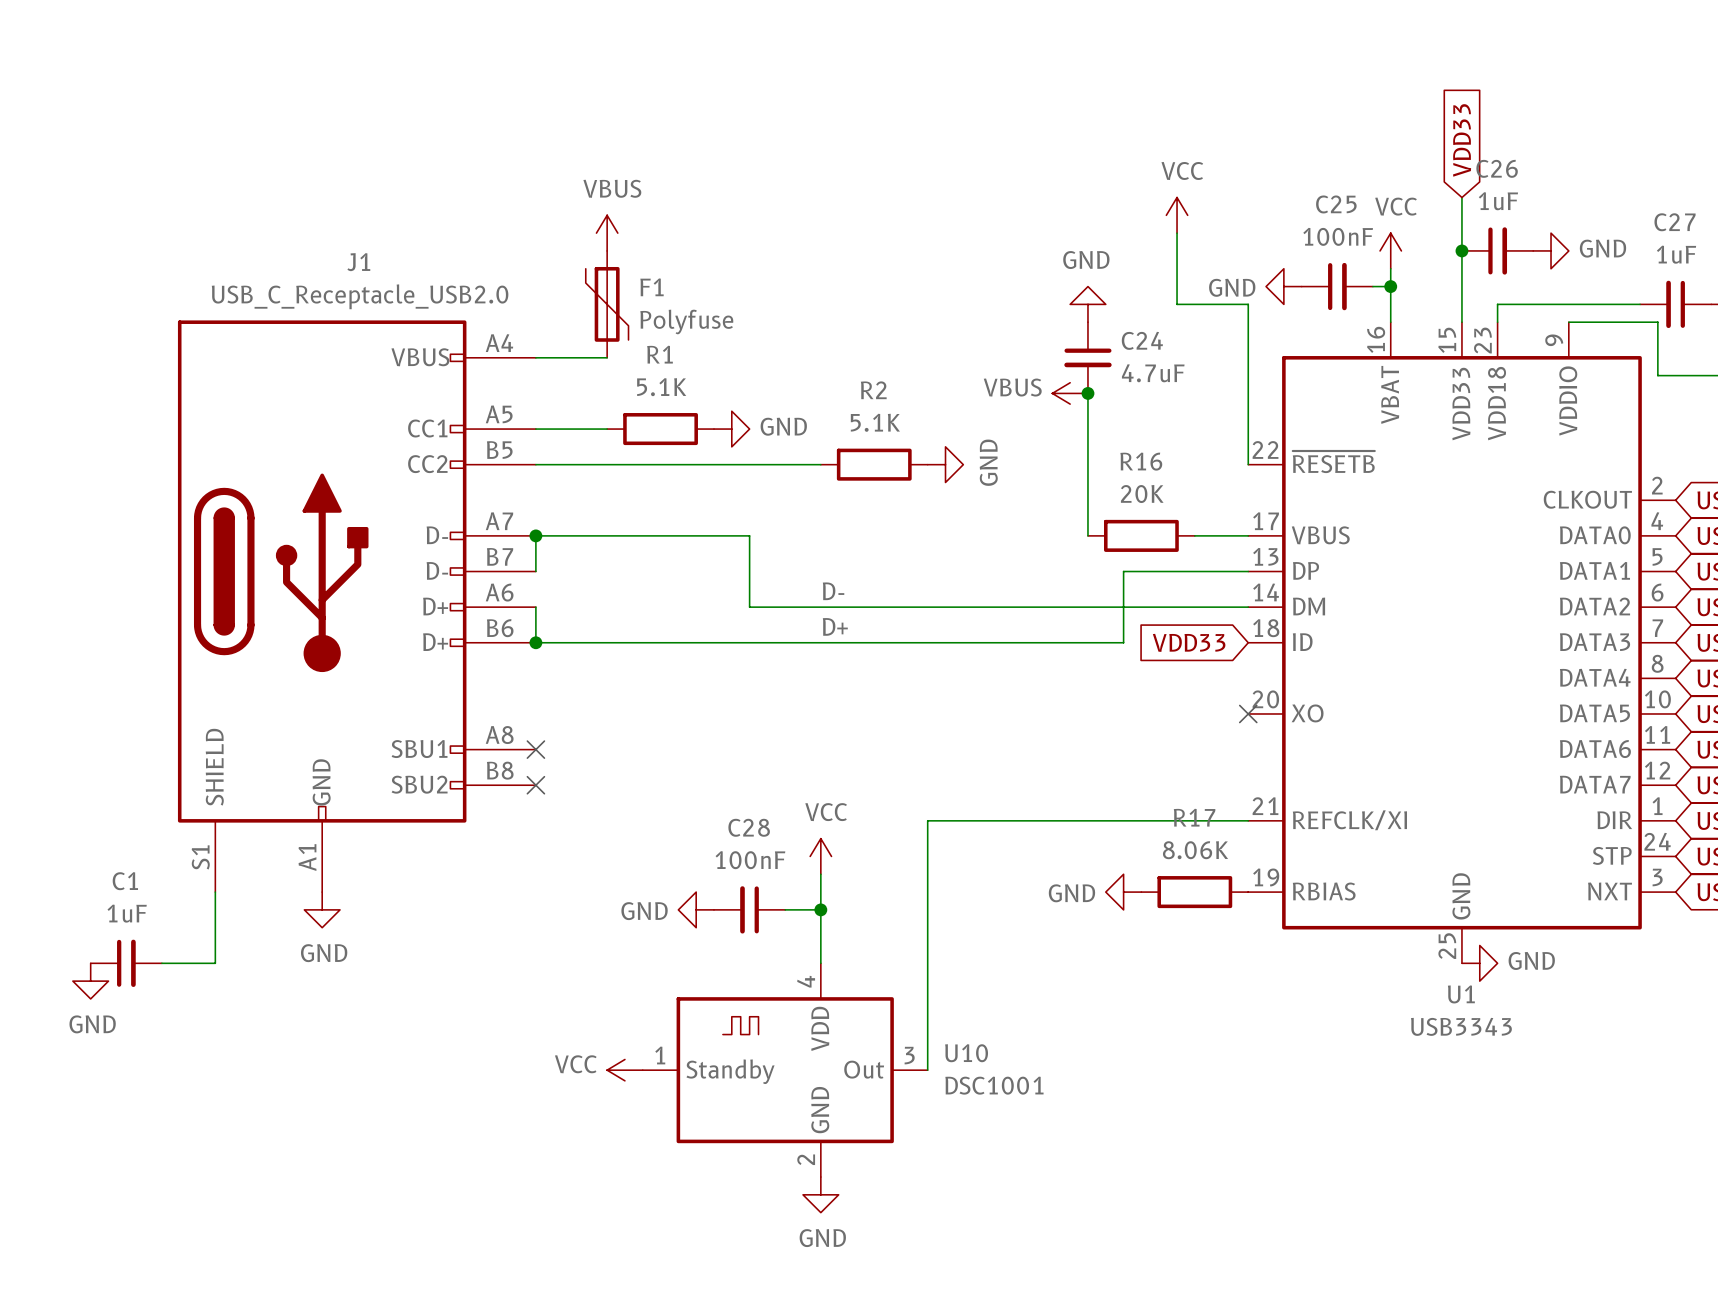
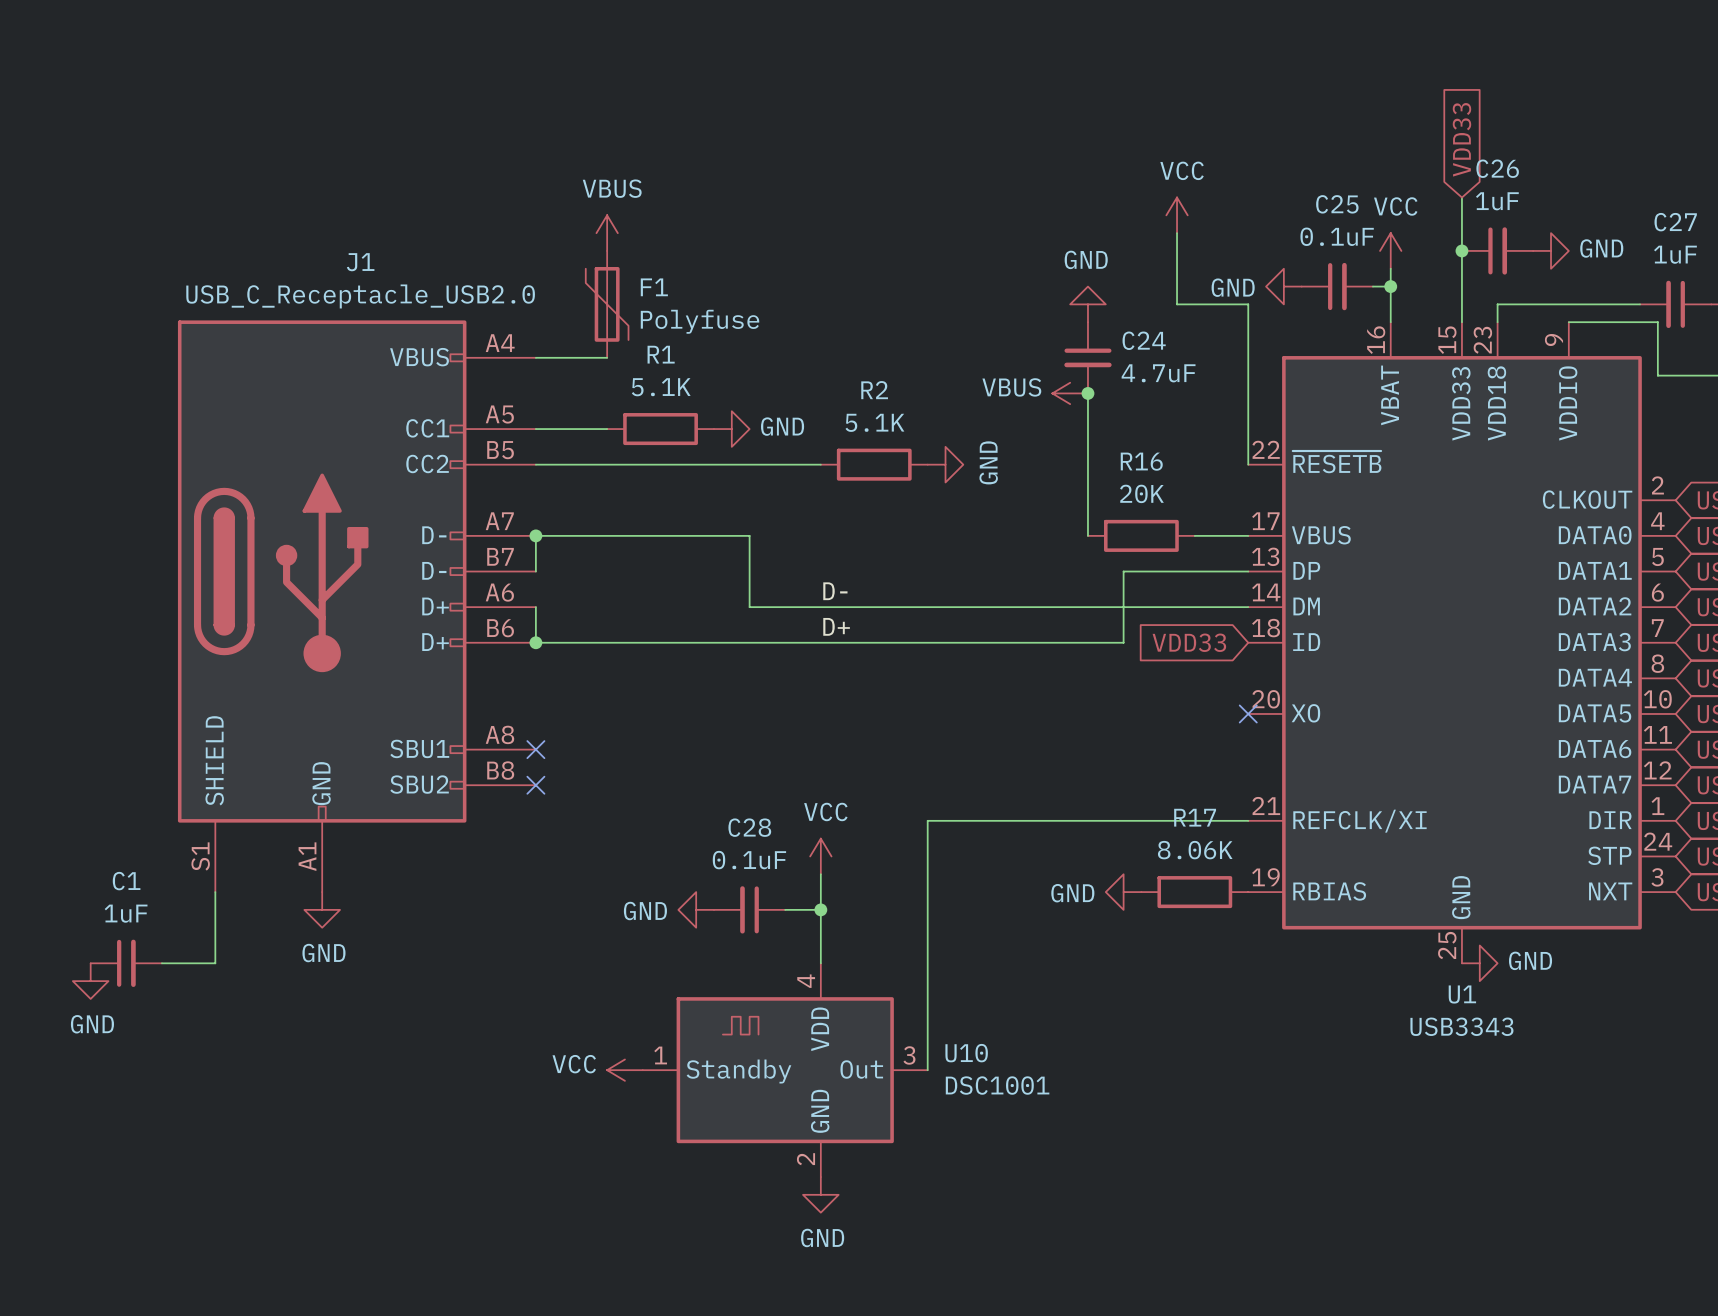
C25 value: 100nF (1338, 236) -> 0.1uF (1337, 236)
C28 value: 100nF (750, 860) -> 0.1uF (749, 860)

